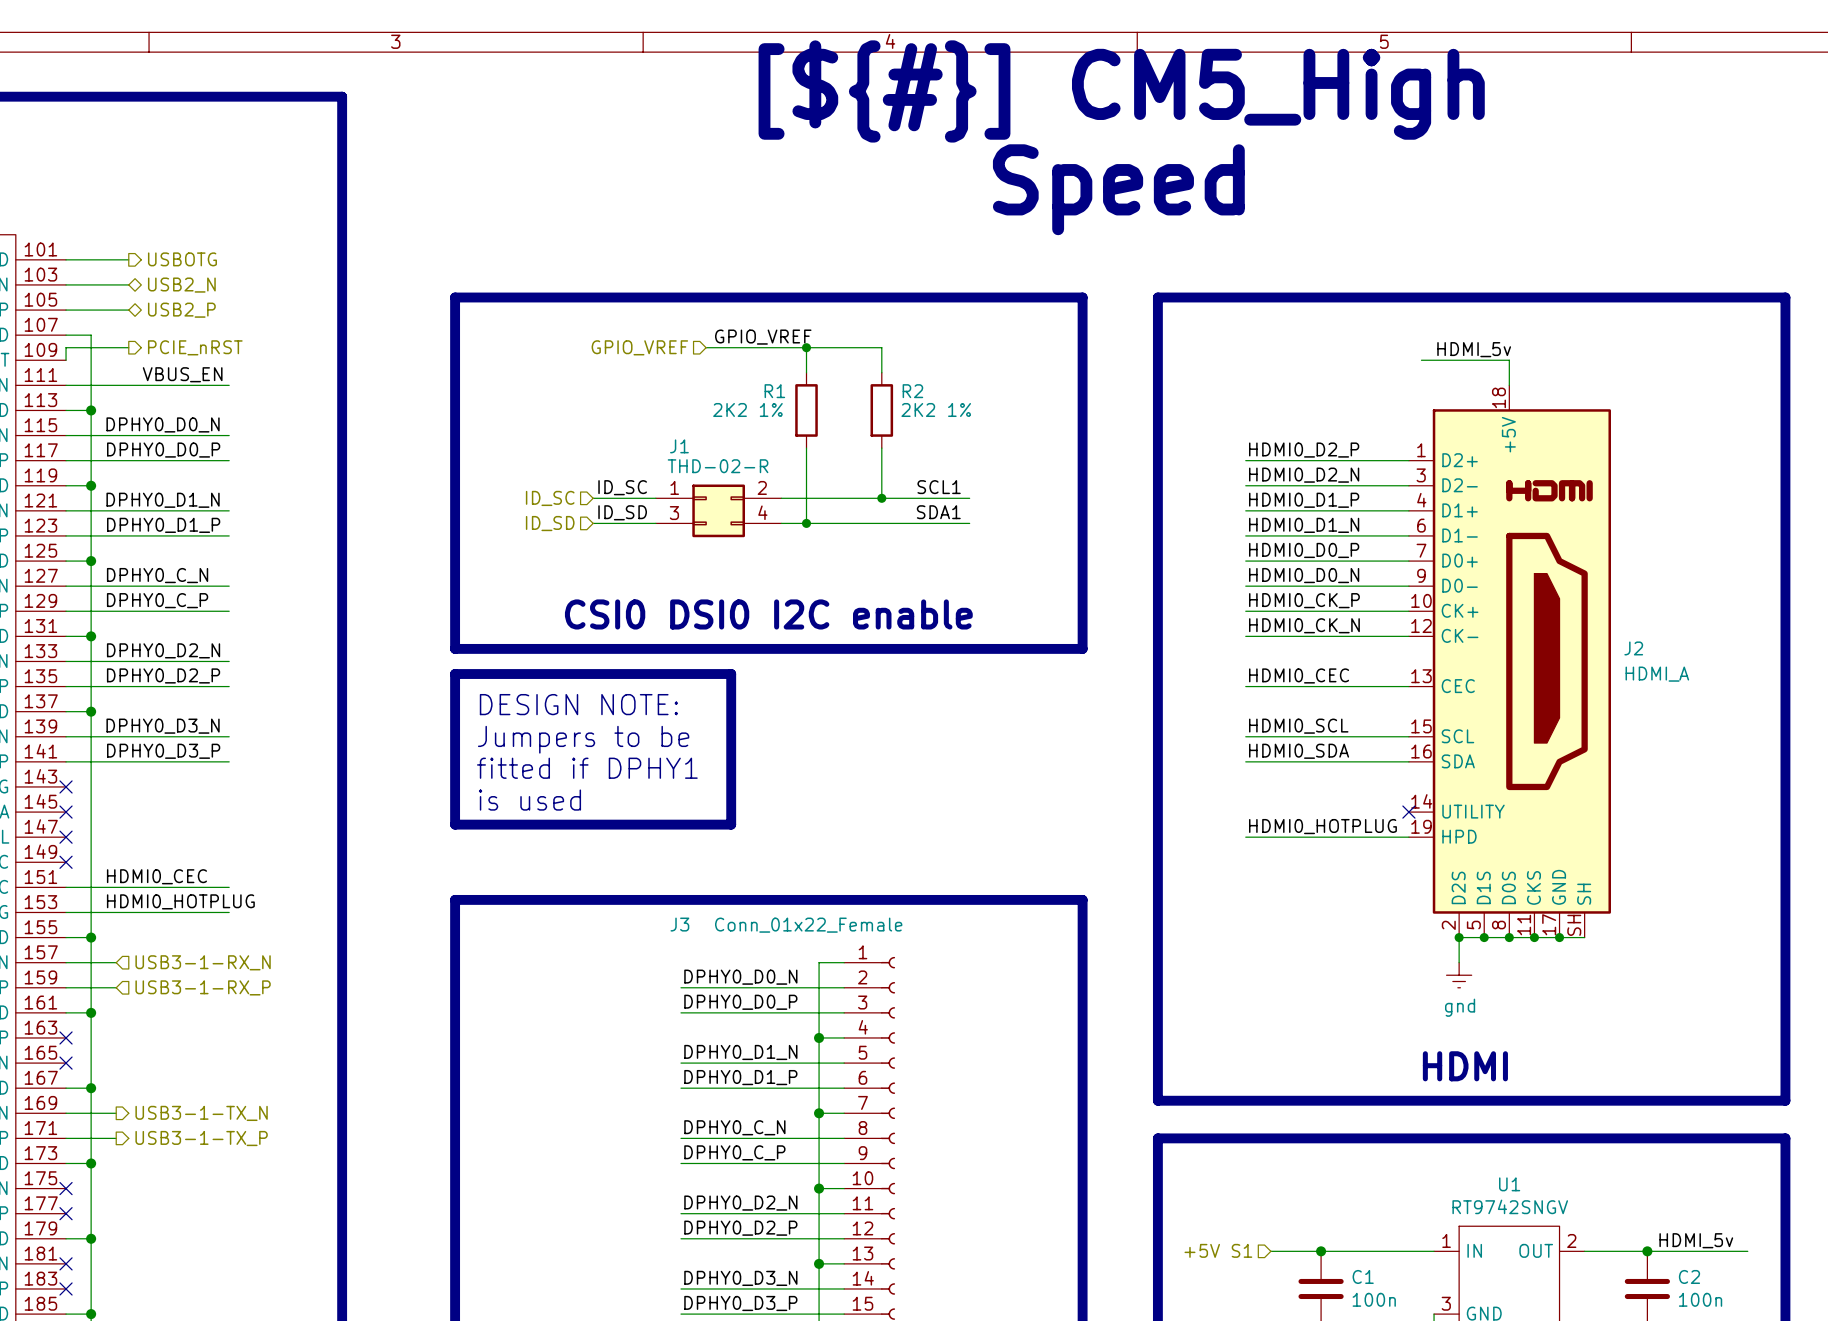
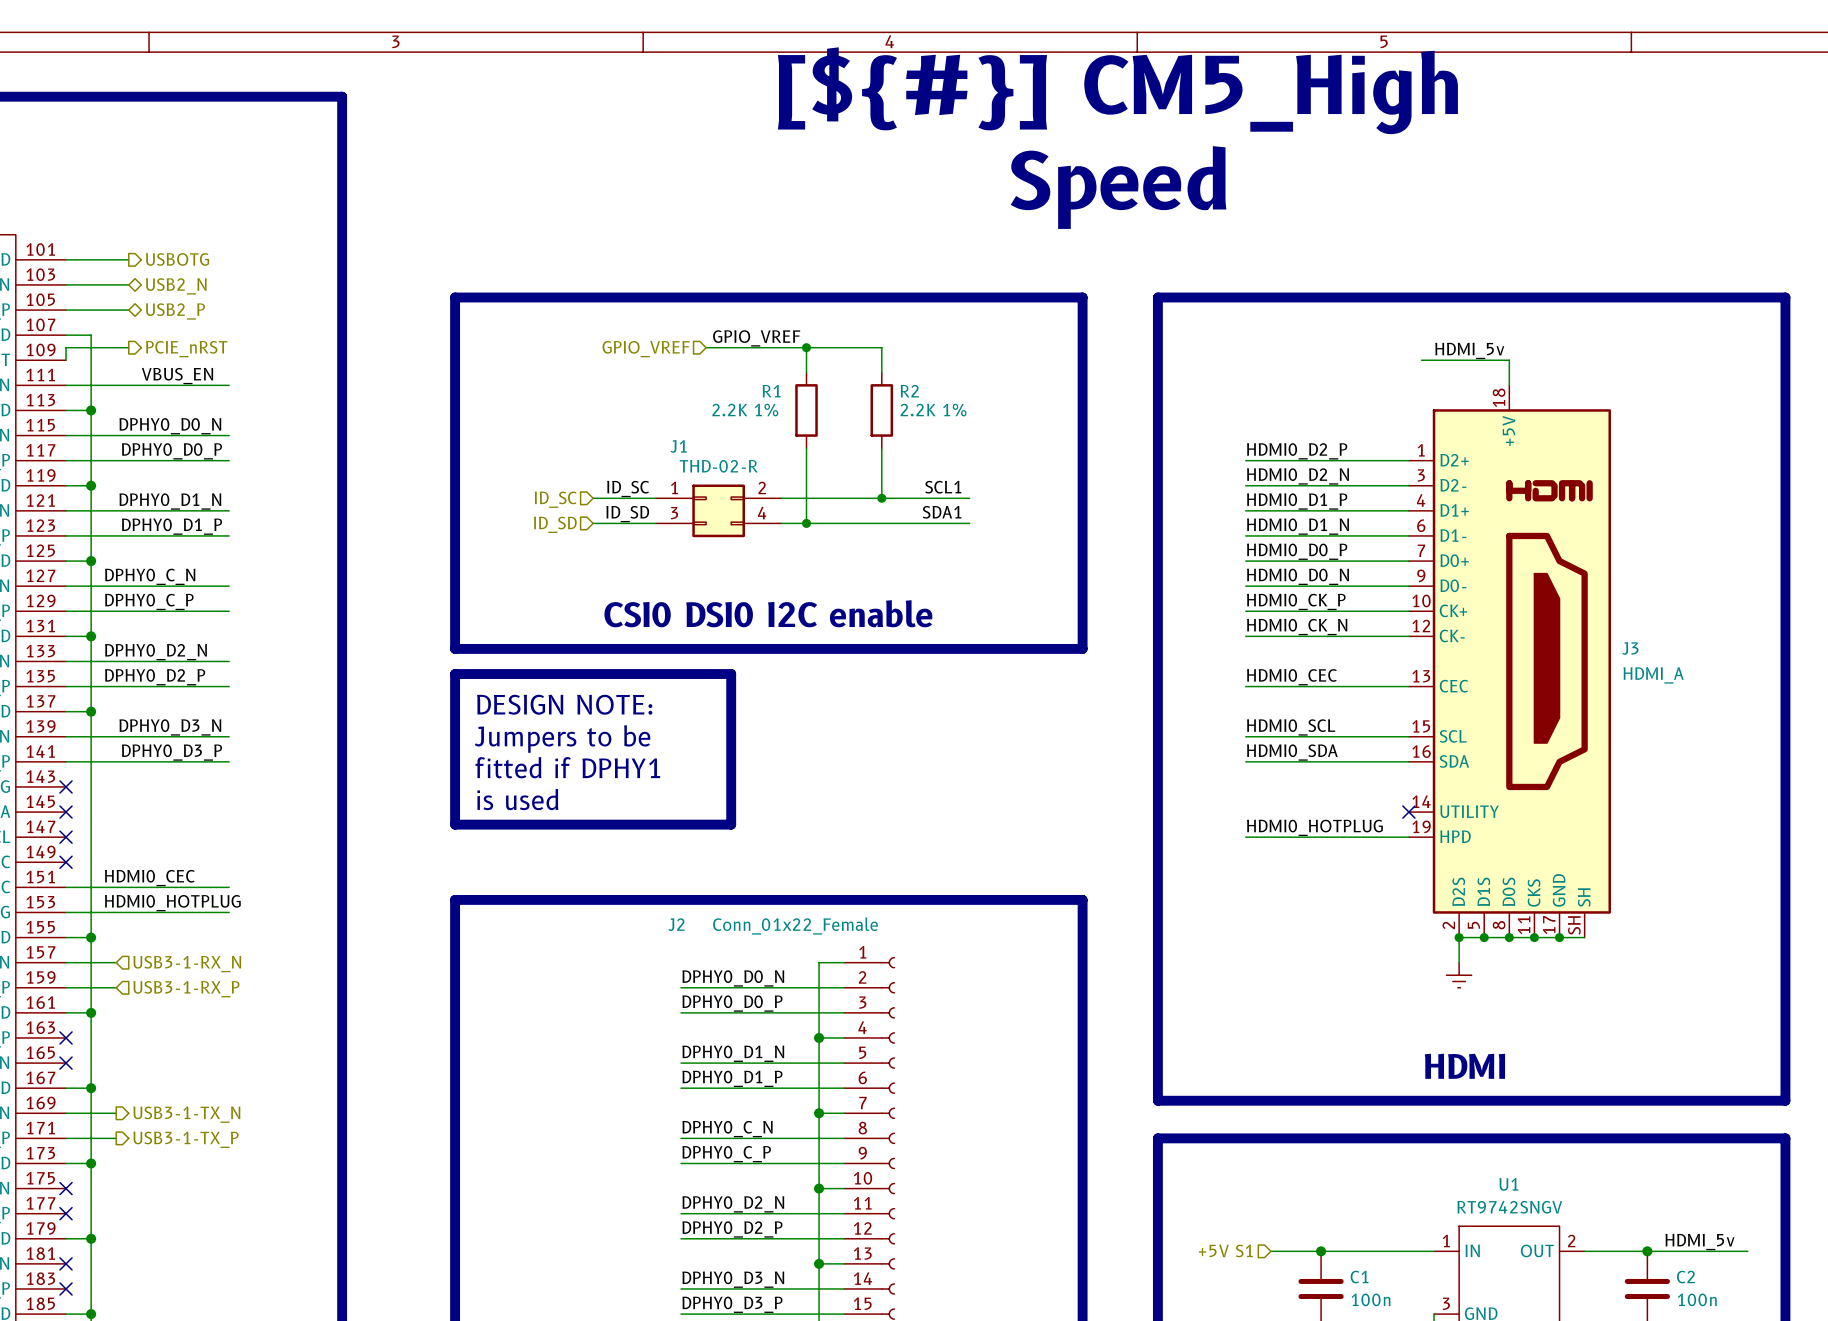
R1 value: 2K2 1% (747, 409) -> 2.2K 1% (745, 410)
R2 value: 2K2 1% (936, 409) -> 2.2K 1% (933, 410)
J2 name: J2 (1633, 648) -> J3 (1630, 648)
J3 name: J3 (679, 924) -> J2 (676, 924)
power symbol text: gnd (1460, 1007) -> none

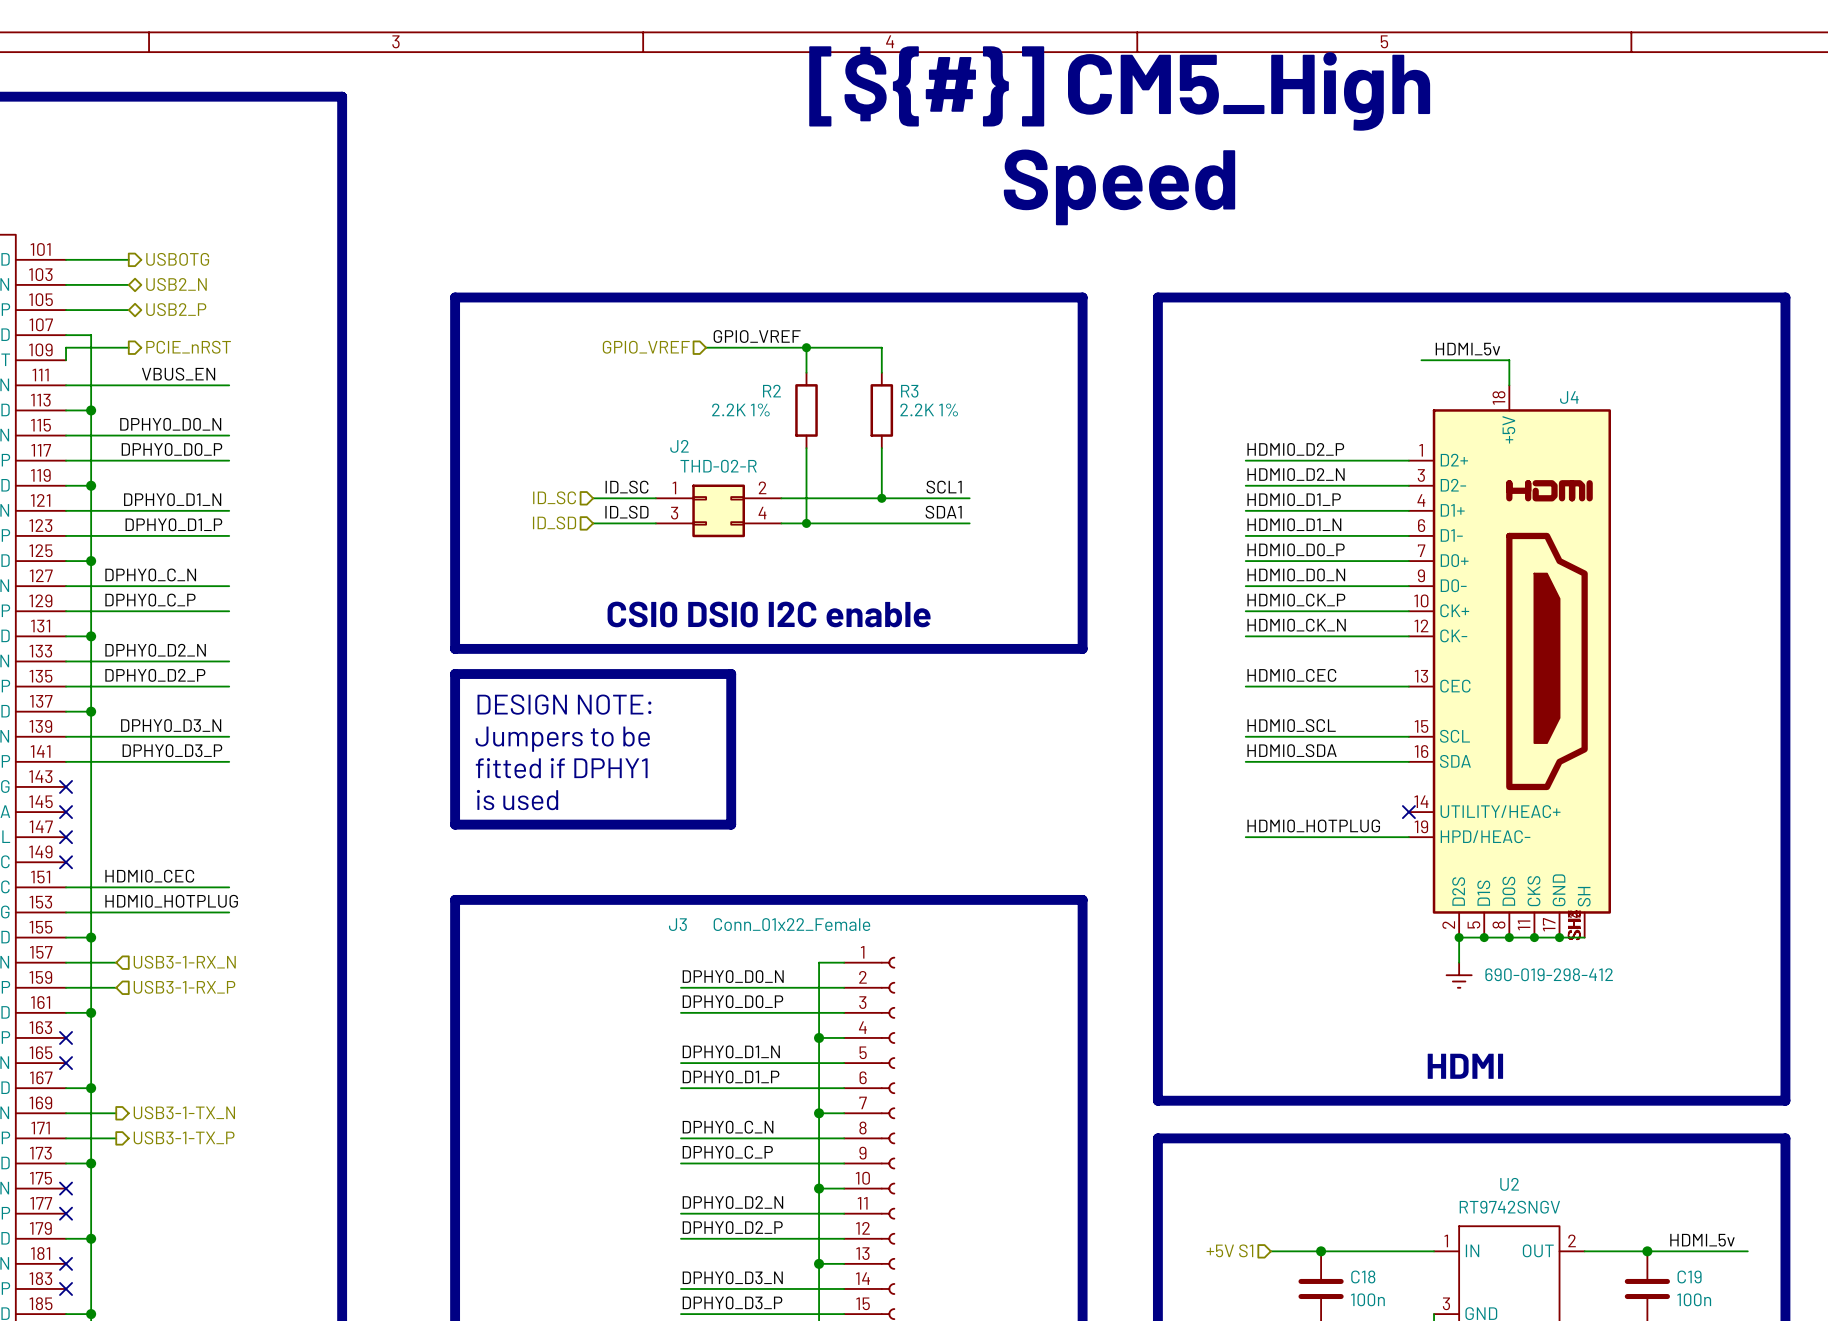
J3 symbol: [1408, 385, 1611, 938] -> [1408, 385, 1611, 938]
R1 name: R1 (771, 391) -> R2 (771, 391)
R2 name: R2 (909, 391) -> R3 (909, 391)
J1 name: J1 (678, 446) -> J2 (679, 446)
J3 name: J3 (1630, 648) -> J4 (1569, 397)
J3 value: HDMI_A (1653, 675) -> 690-019-298-412 (1549, 974)
J2 name: J2 (676, 924) -> J3 (677, 924)
U1 name: U1 (1508, 1184) -> U2 (1509, 1184)
C1 name: C1 (1359, 1277) -> C18 (1363, 1276)
C2 name: C2 (1685, 1277) -> C19 (1689, 1276)

